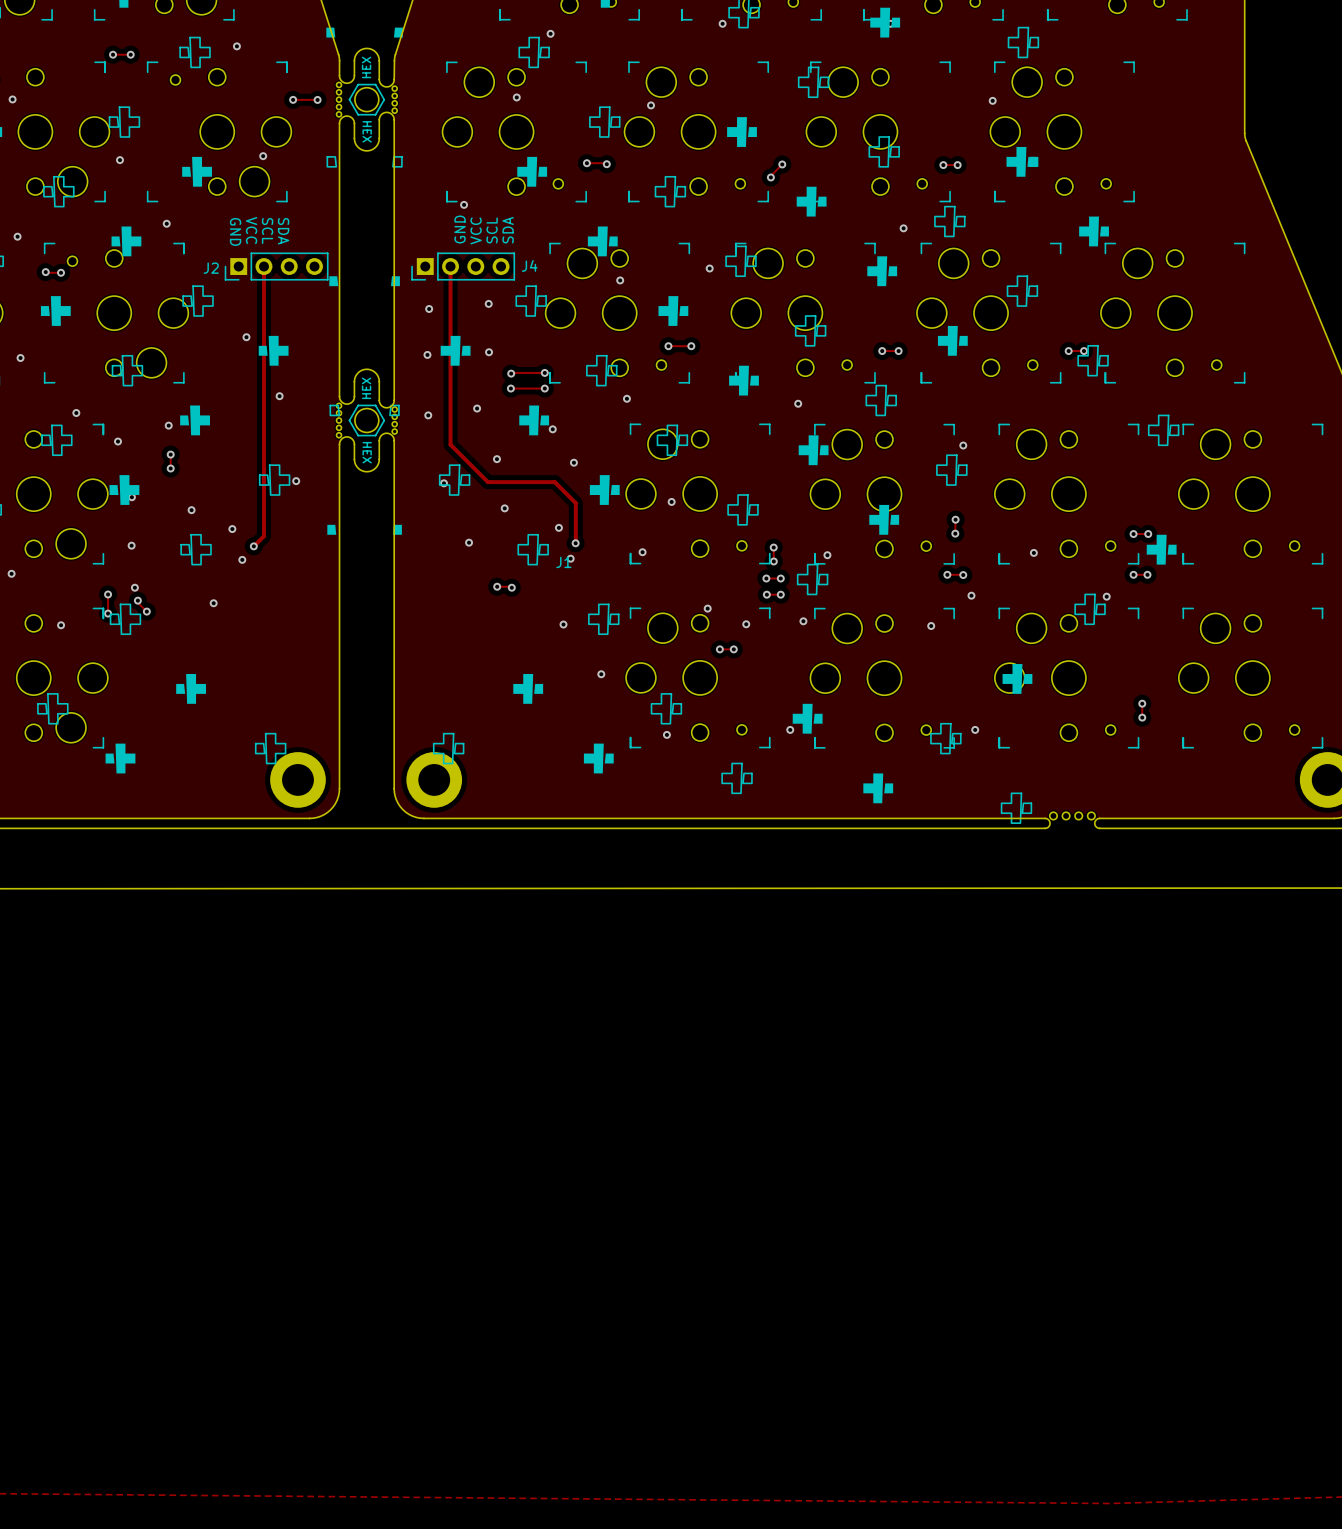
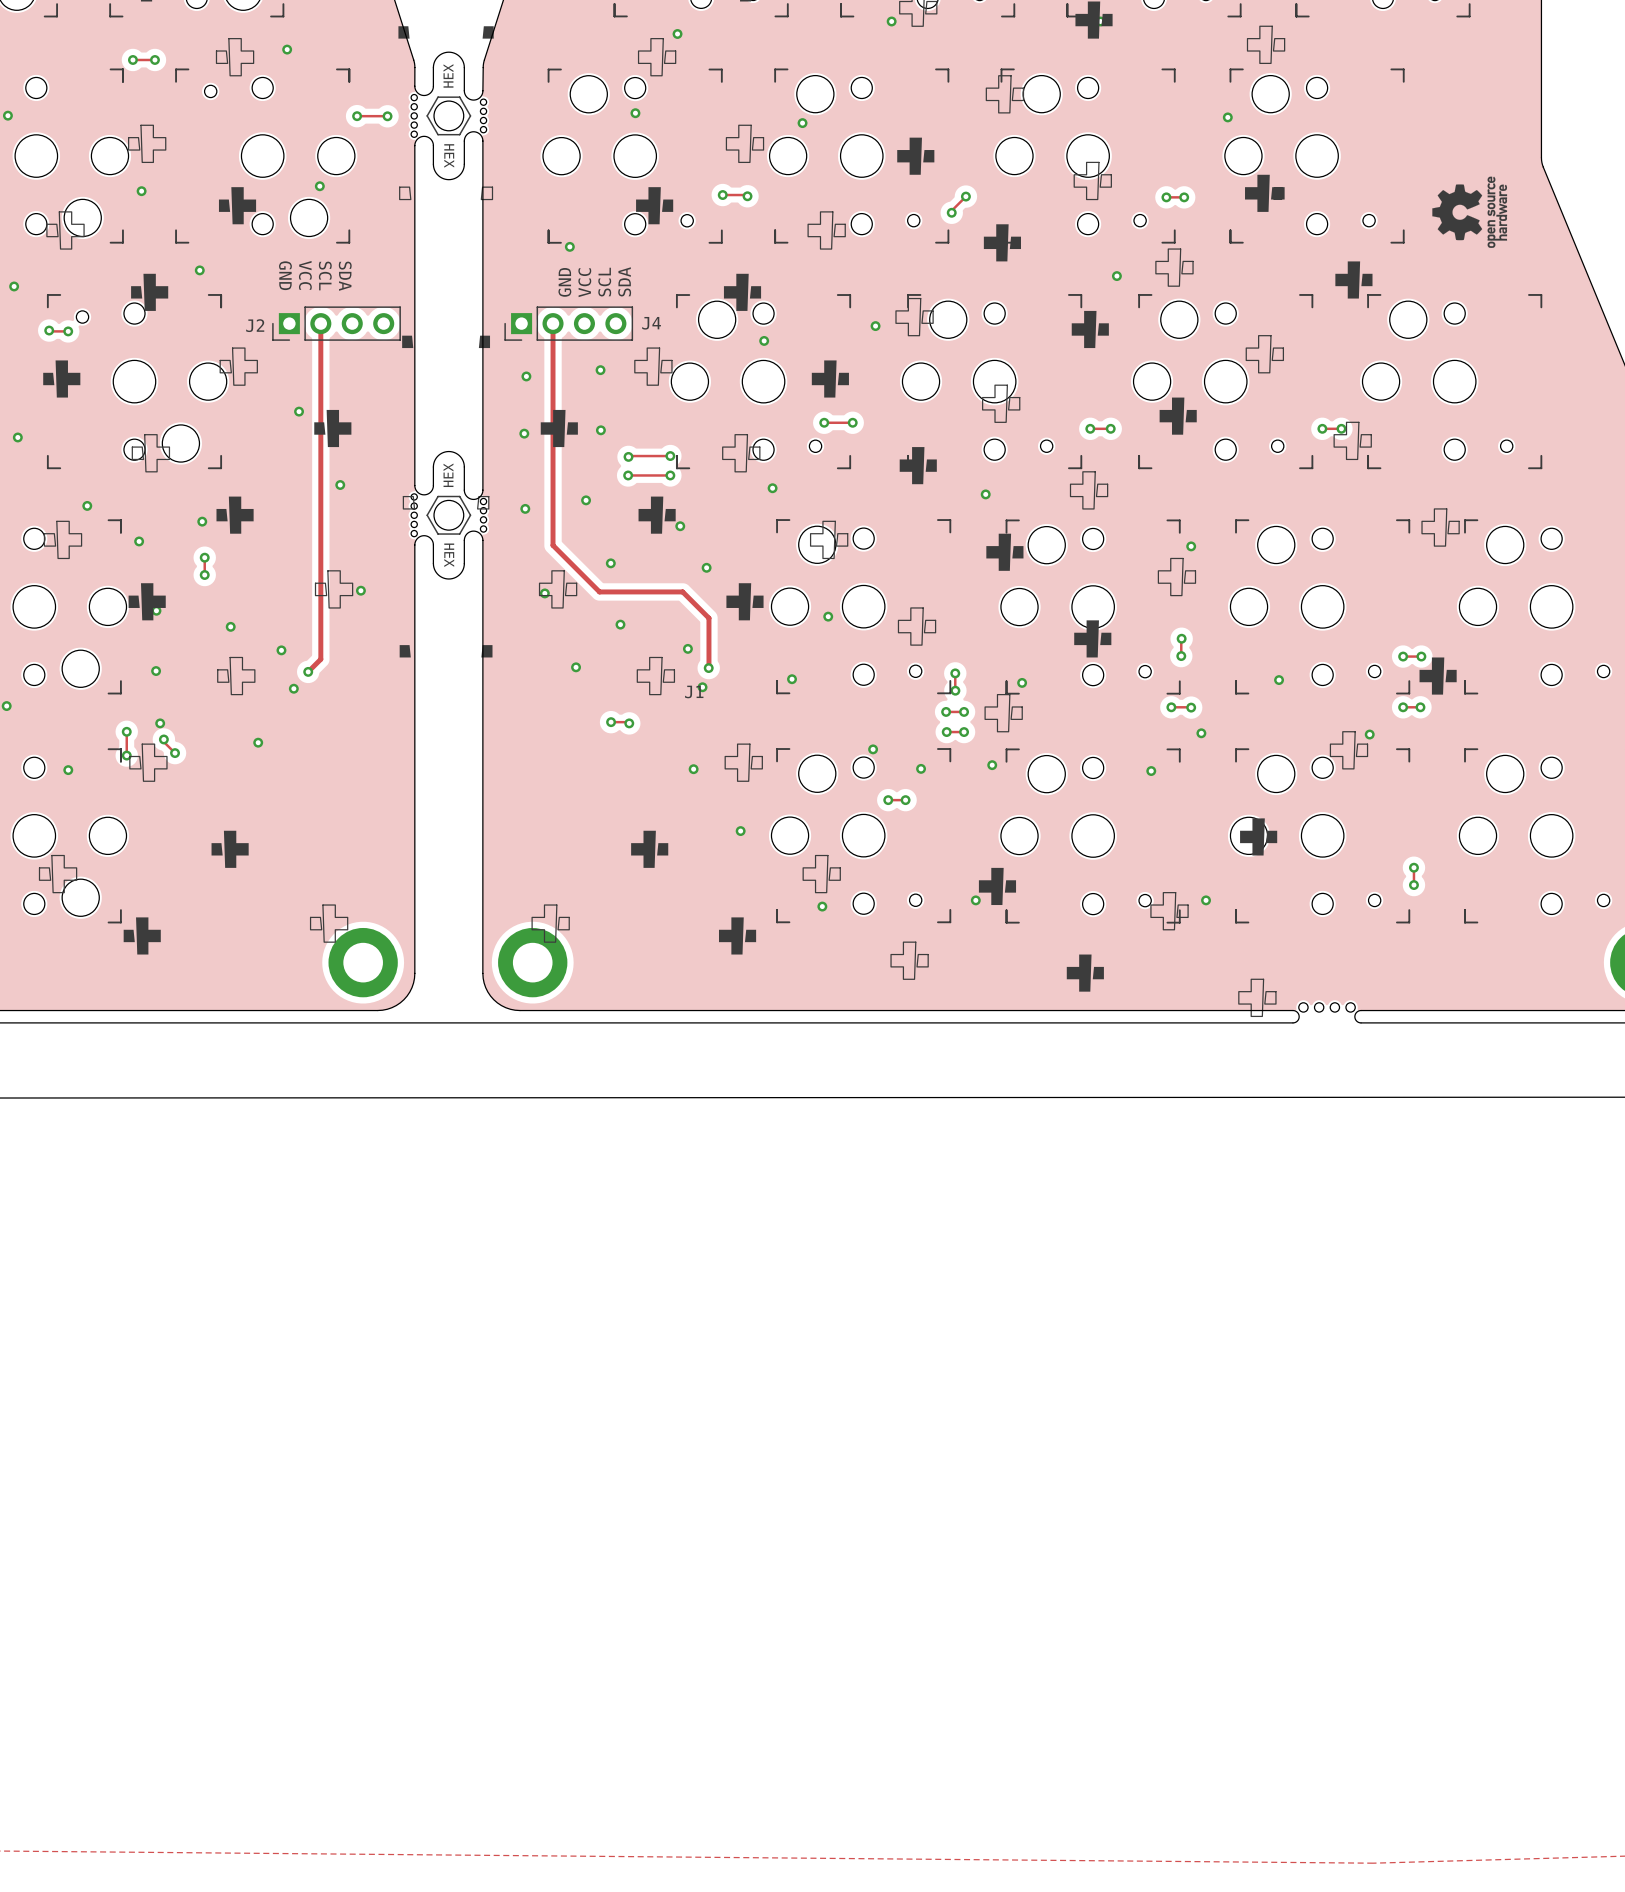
drawing: none -> [1432, 176, 1508, 248]

